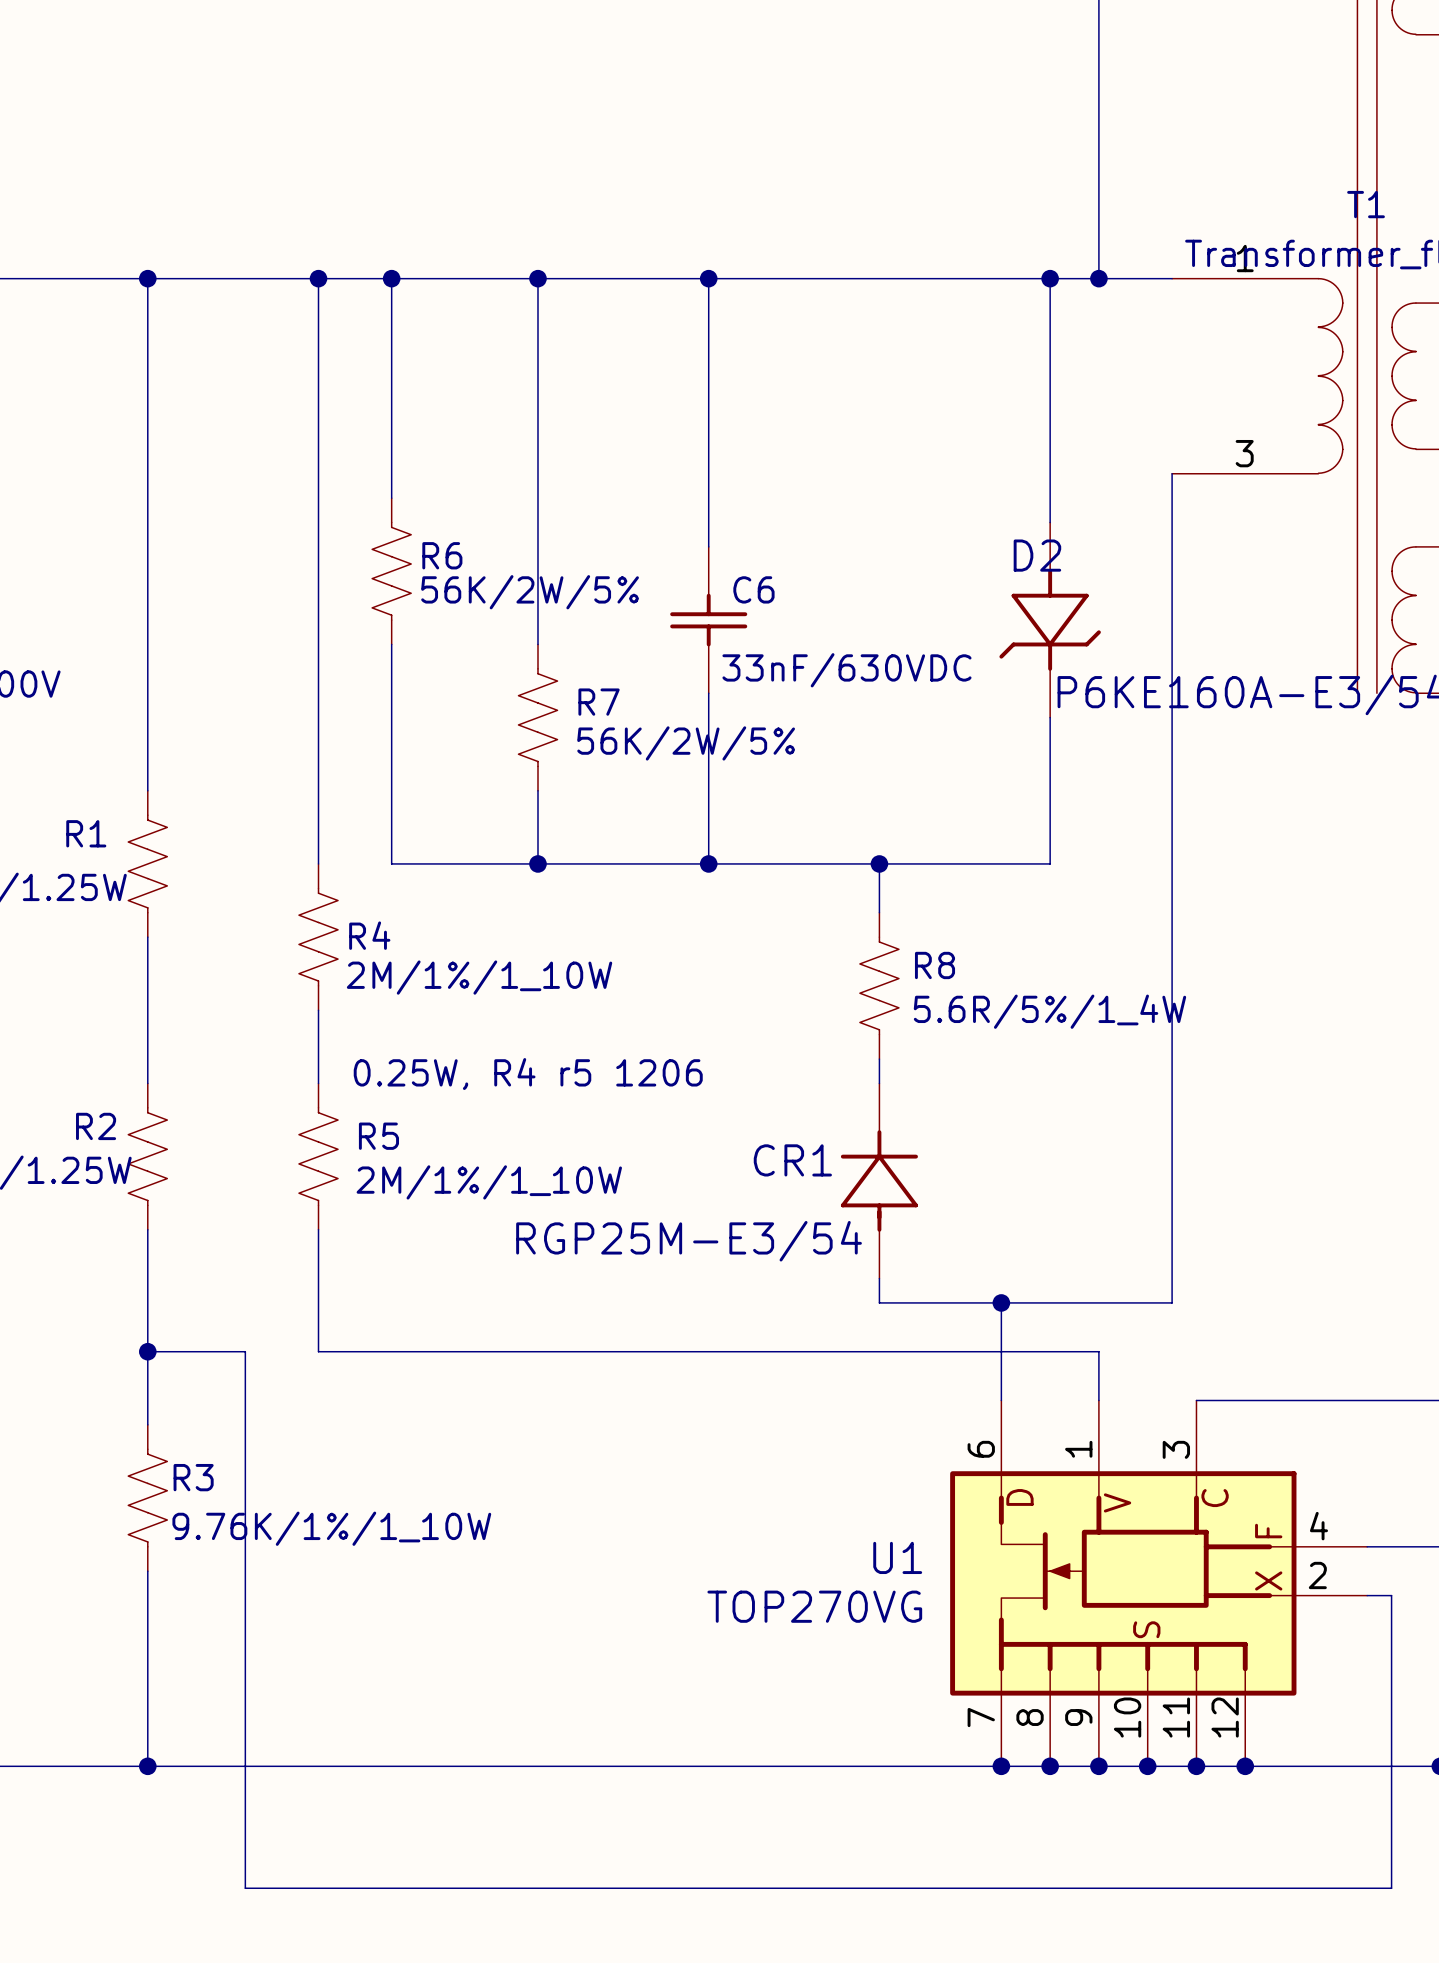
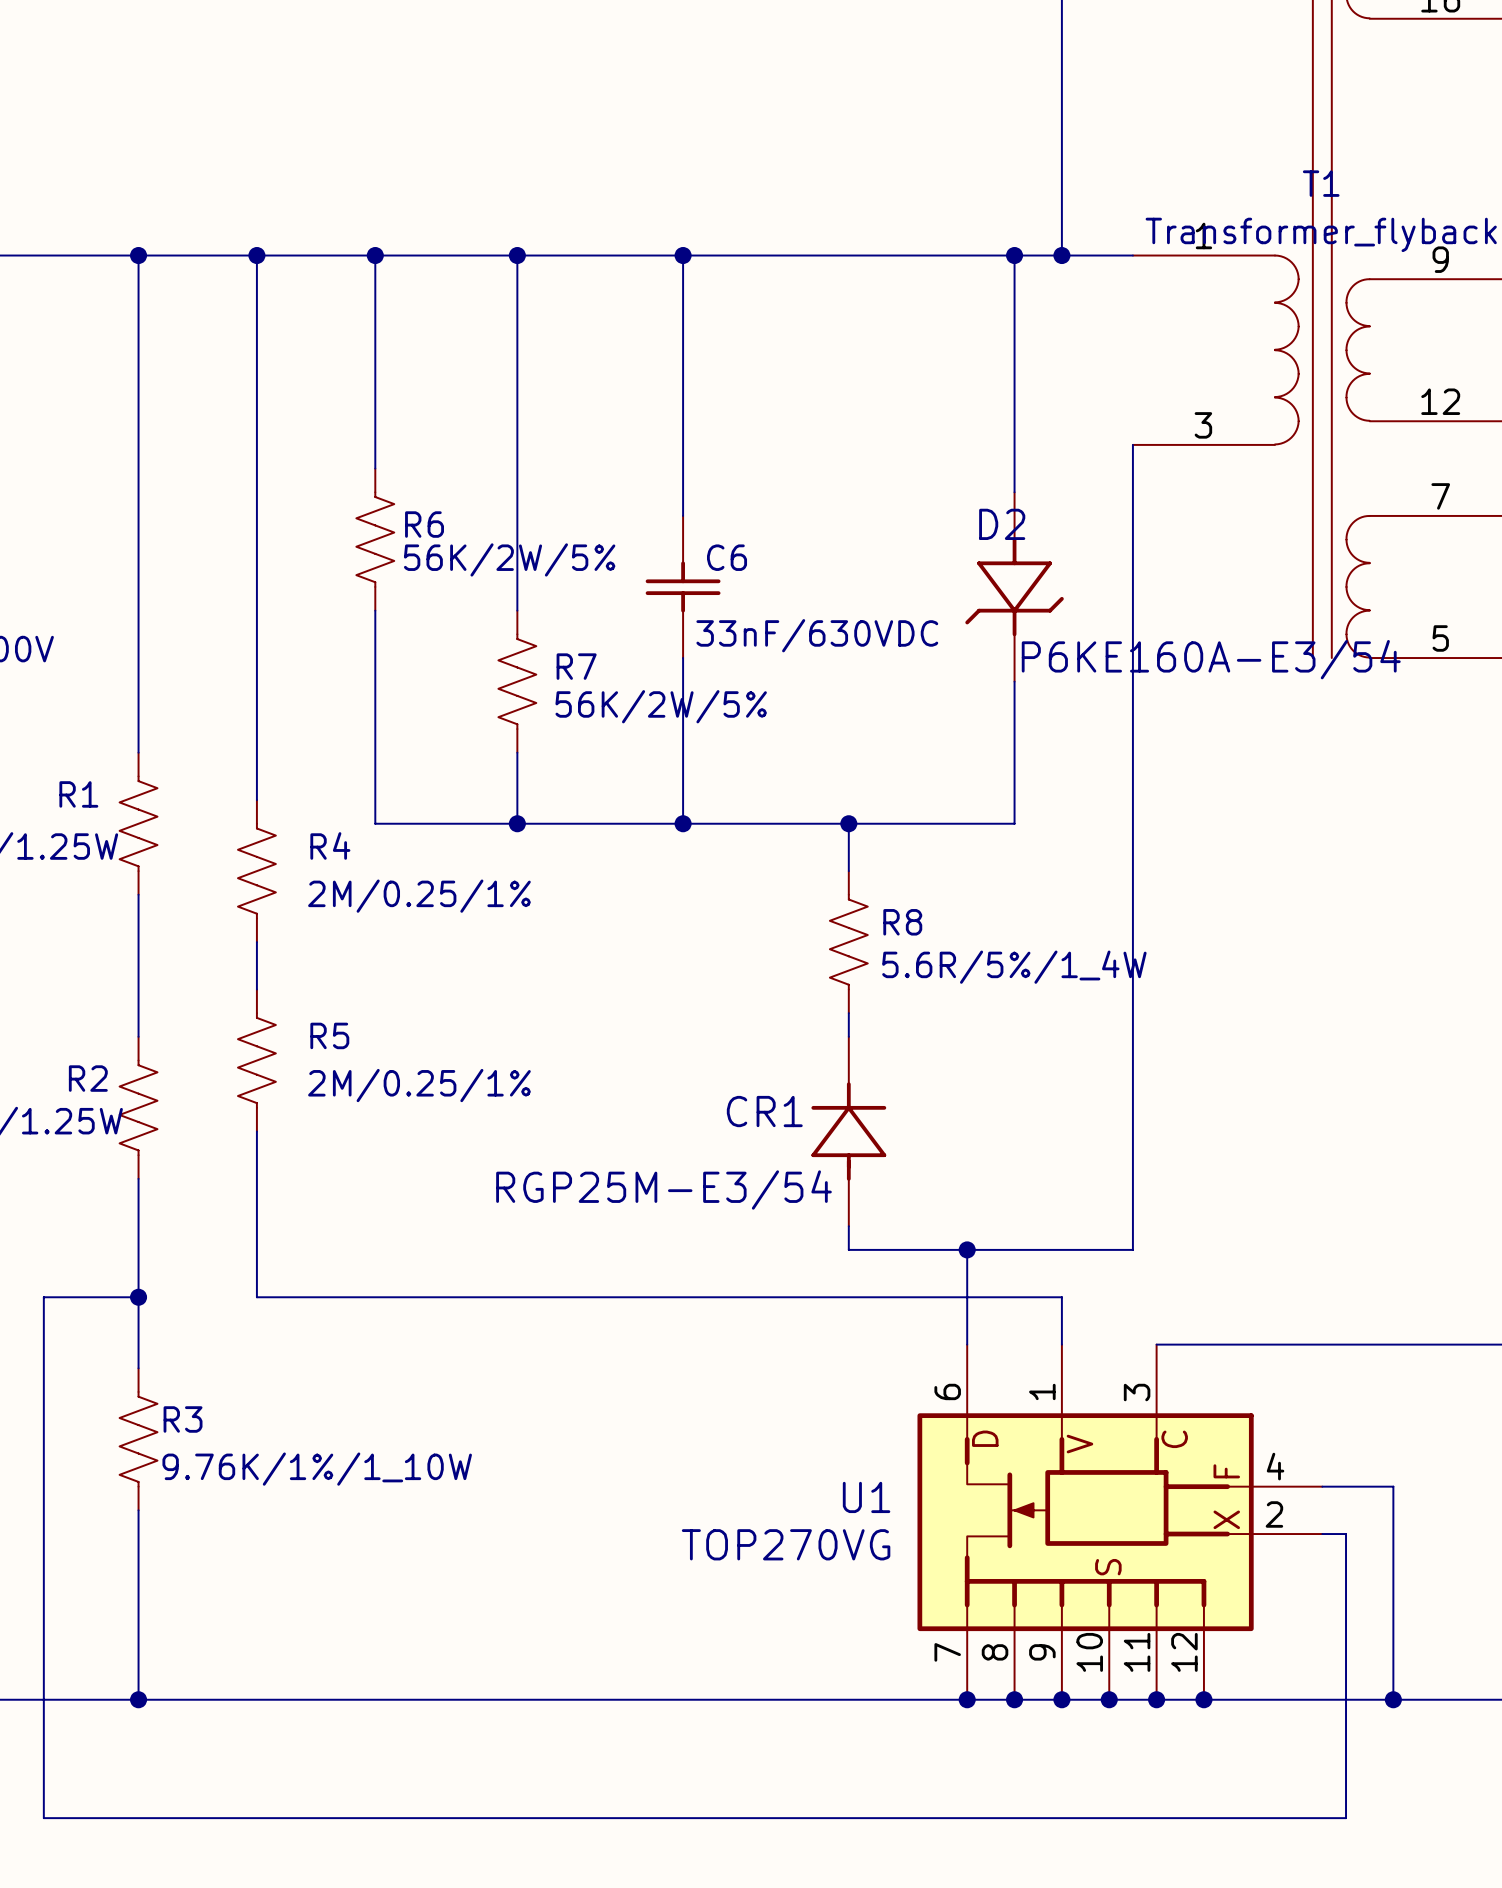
wire: none -> (256, 255) (256, 800)
wire: (318, 278) (318, 863) -> none
junction position: (318, 278) -> (256, 255)
R4 name position: R4 (369, 935) -> R4 (330, 845)
R4 position: (318, 937) -> (256, 871)
R4 value: 2M/1%/1_10W (479, 977) -> 2M/0.25/1% (419, 896)
wire: none -> (256, 942) (256, 989)
wire: (318, 1010) (318, 1083) -> none
text: 0.25W, R4 r5 1206 (528, 1074) -> none
R5 name position: R5 (378, 1136) -> R5 (329, 1035)
R5 position: (318, 1156) -> (256, 1060)
R5 value: 2M/1%/1_10W (489, 1182) -> 2M/0.25/1% (419, 1085)
wire: (318, 1229) (318, 1351) -> (256, 1131) (256, 1297) (304, 1297)
wire: (147, 1351) (245, 1351) (245, 1888) -> (138, 1297) (43, 1297) (43, 1818) (233, 1818)

